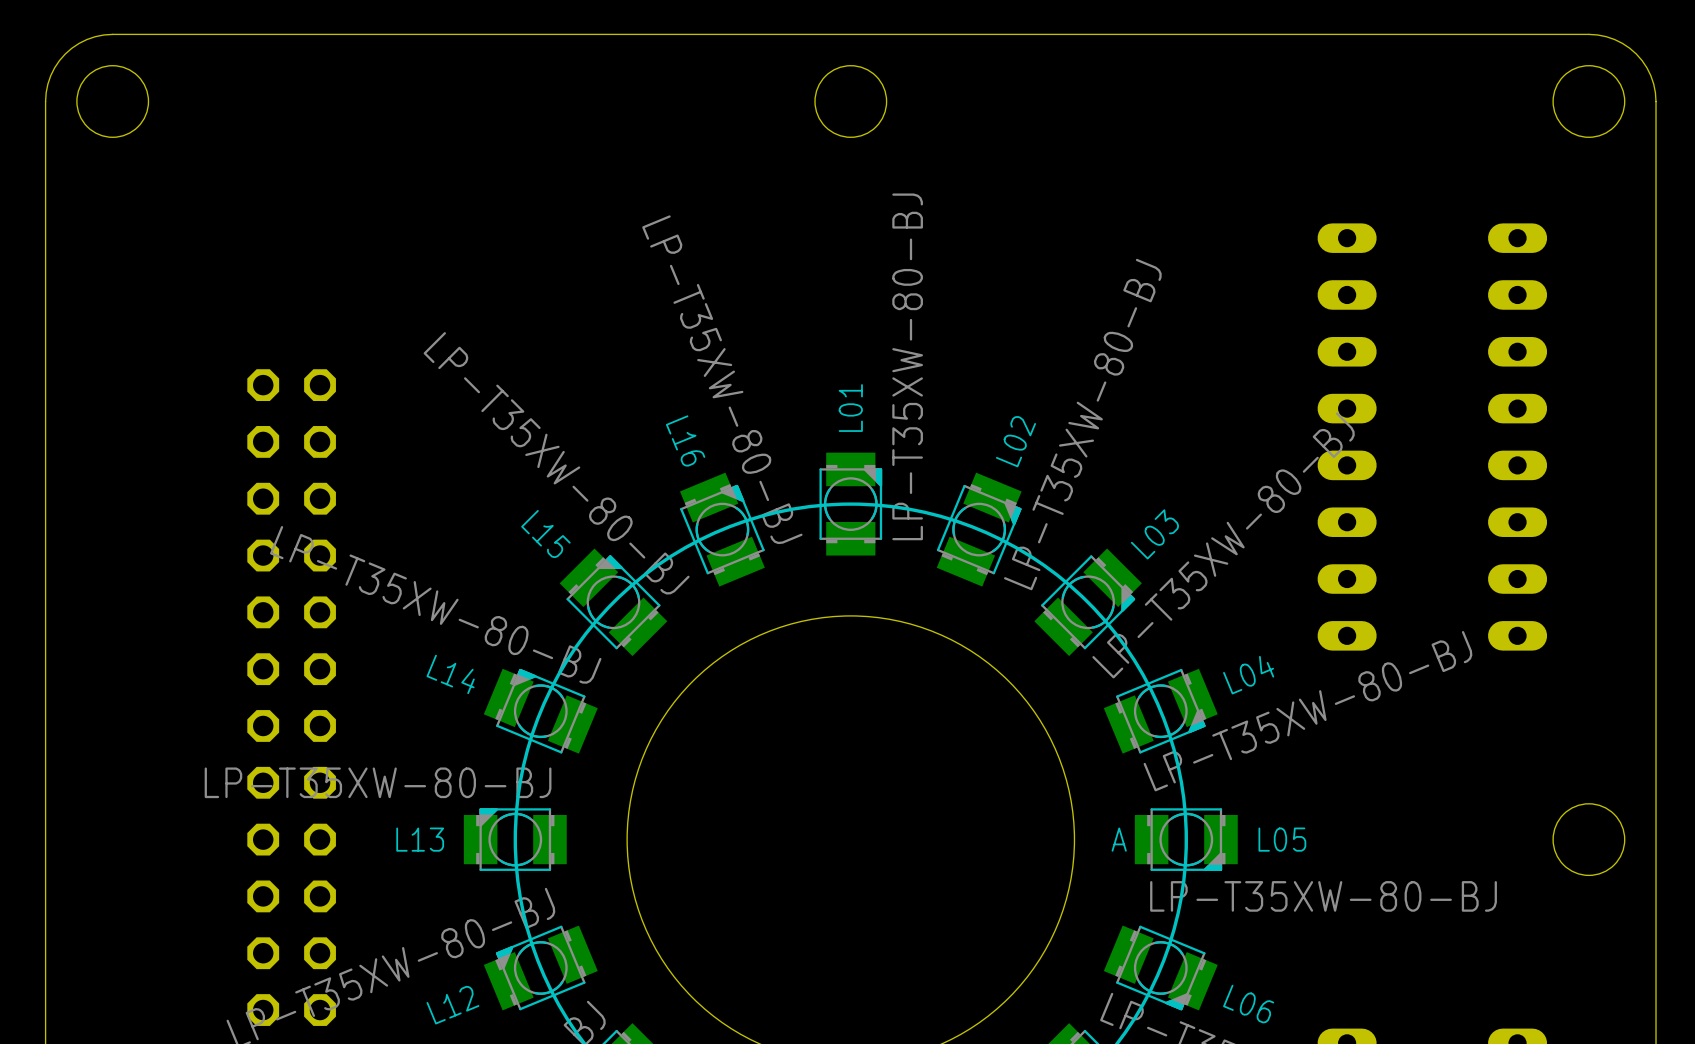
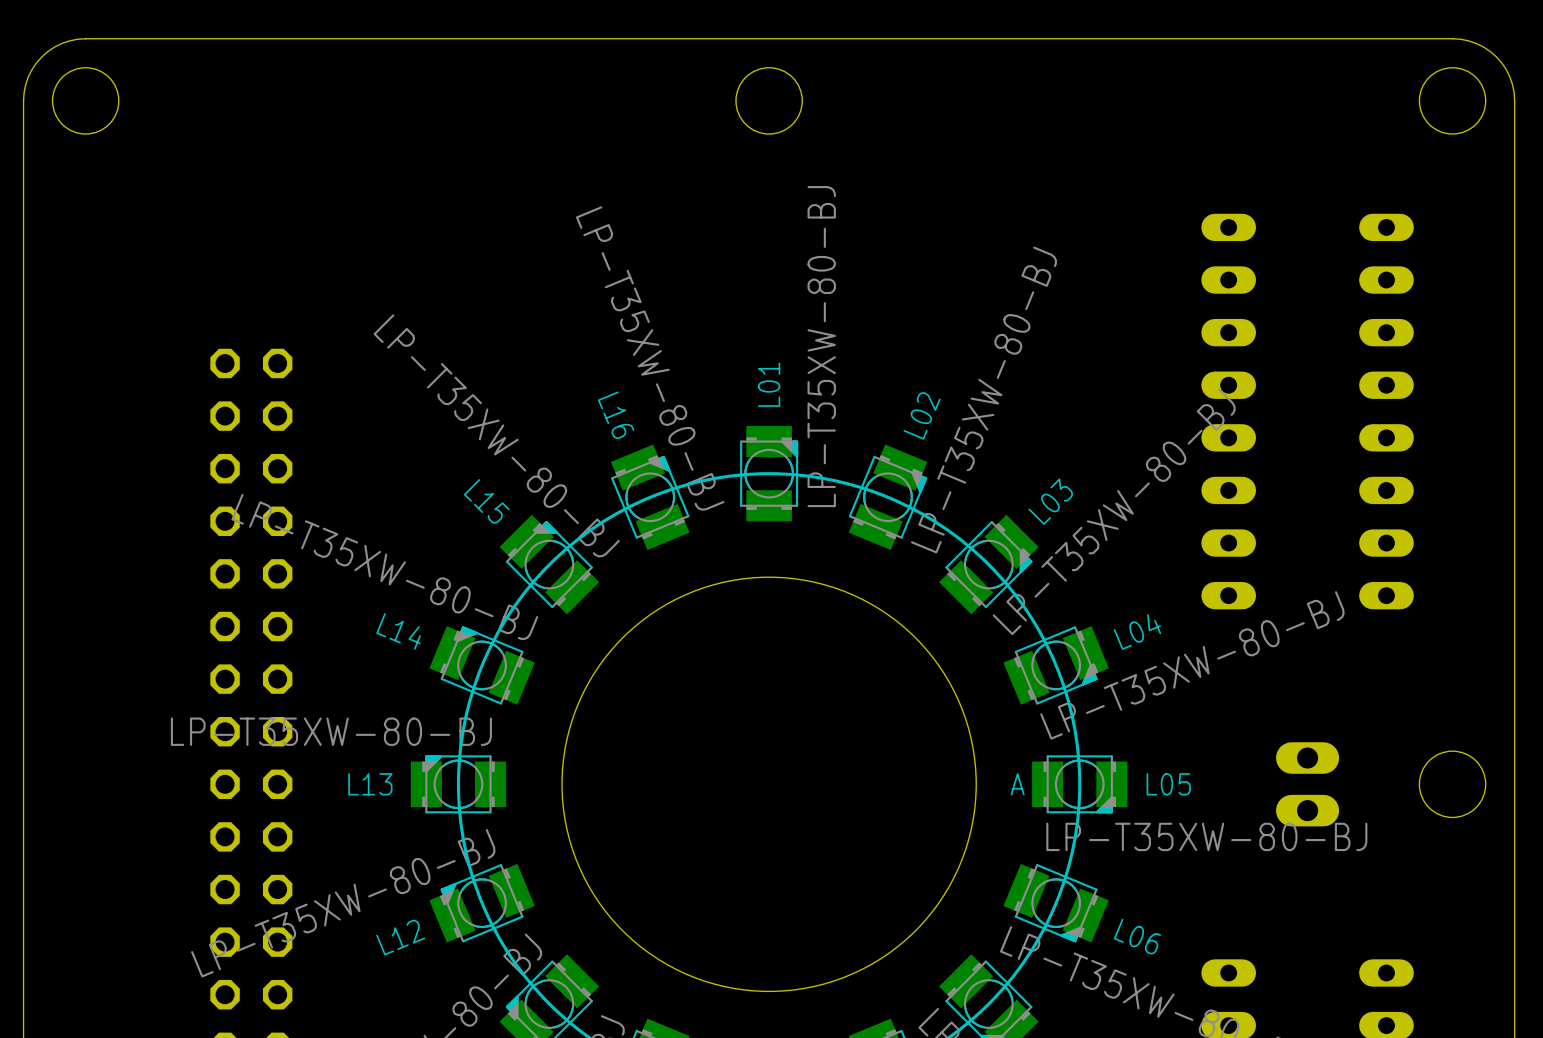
part: none -> (1307, 784)

